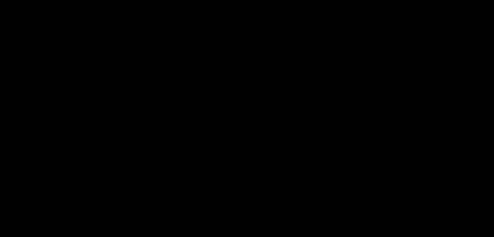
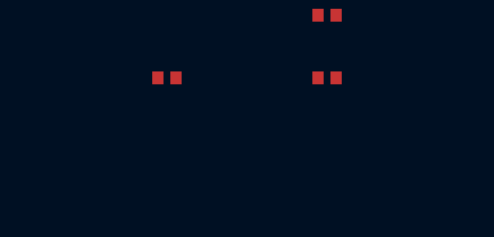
part: none -> (327, 15)
part: none -> (166, 77)
part: none -> (327, 77)

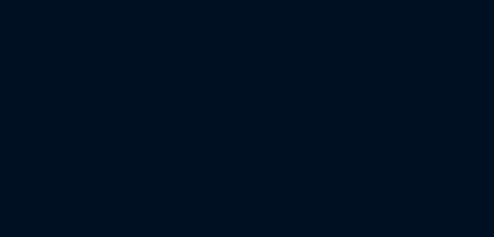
part: (327, 15) -> none
part: (166, 77) -> none
part: (327, 77) -> none

